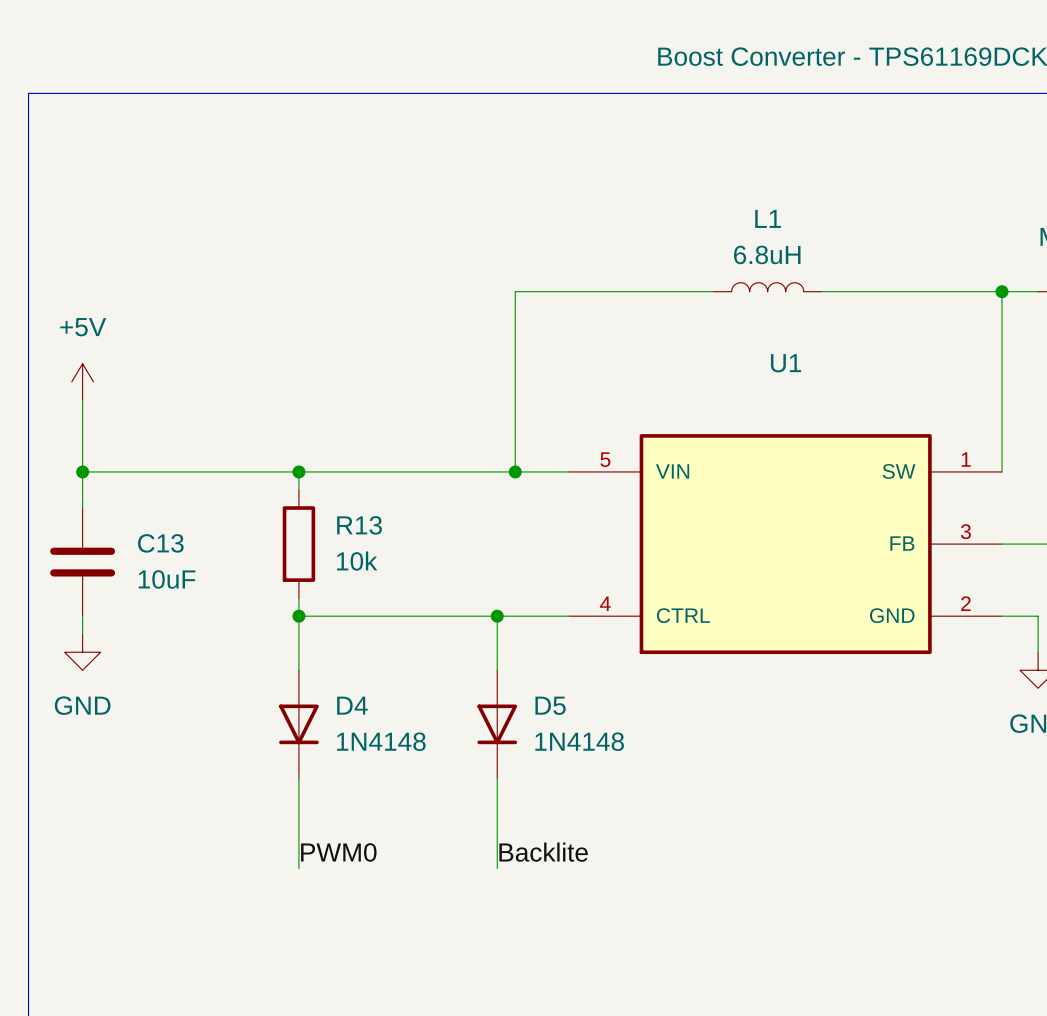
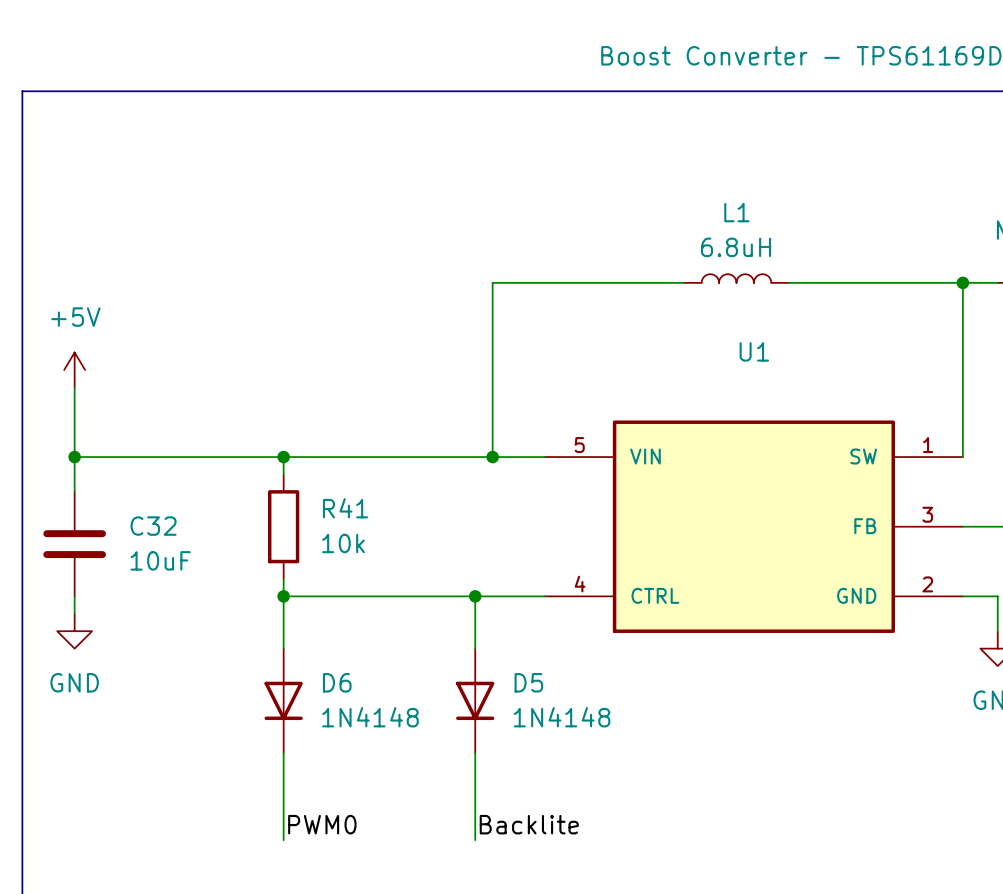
R13 name: R13 (359, 525) -> R41 (345, 508)
C13 name: C13 (160, 543) -> C32 (153, 526)
D4 name: D4 (352, 705) -> D6 (337, 682)

